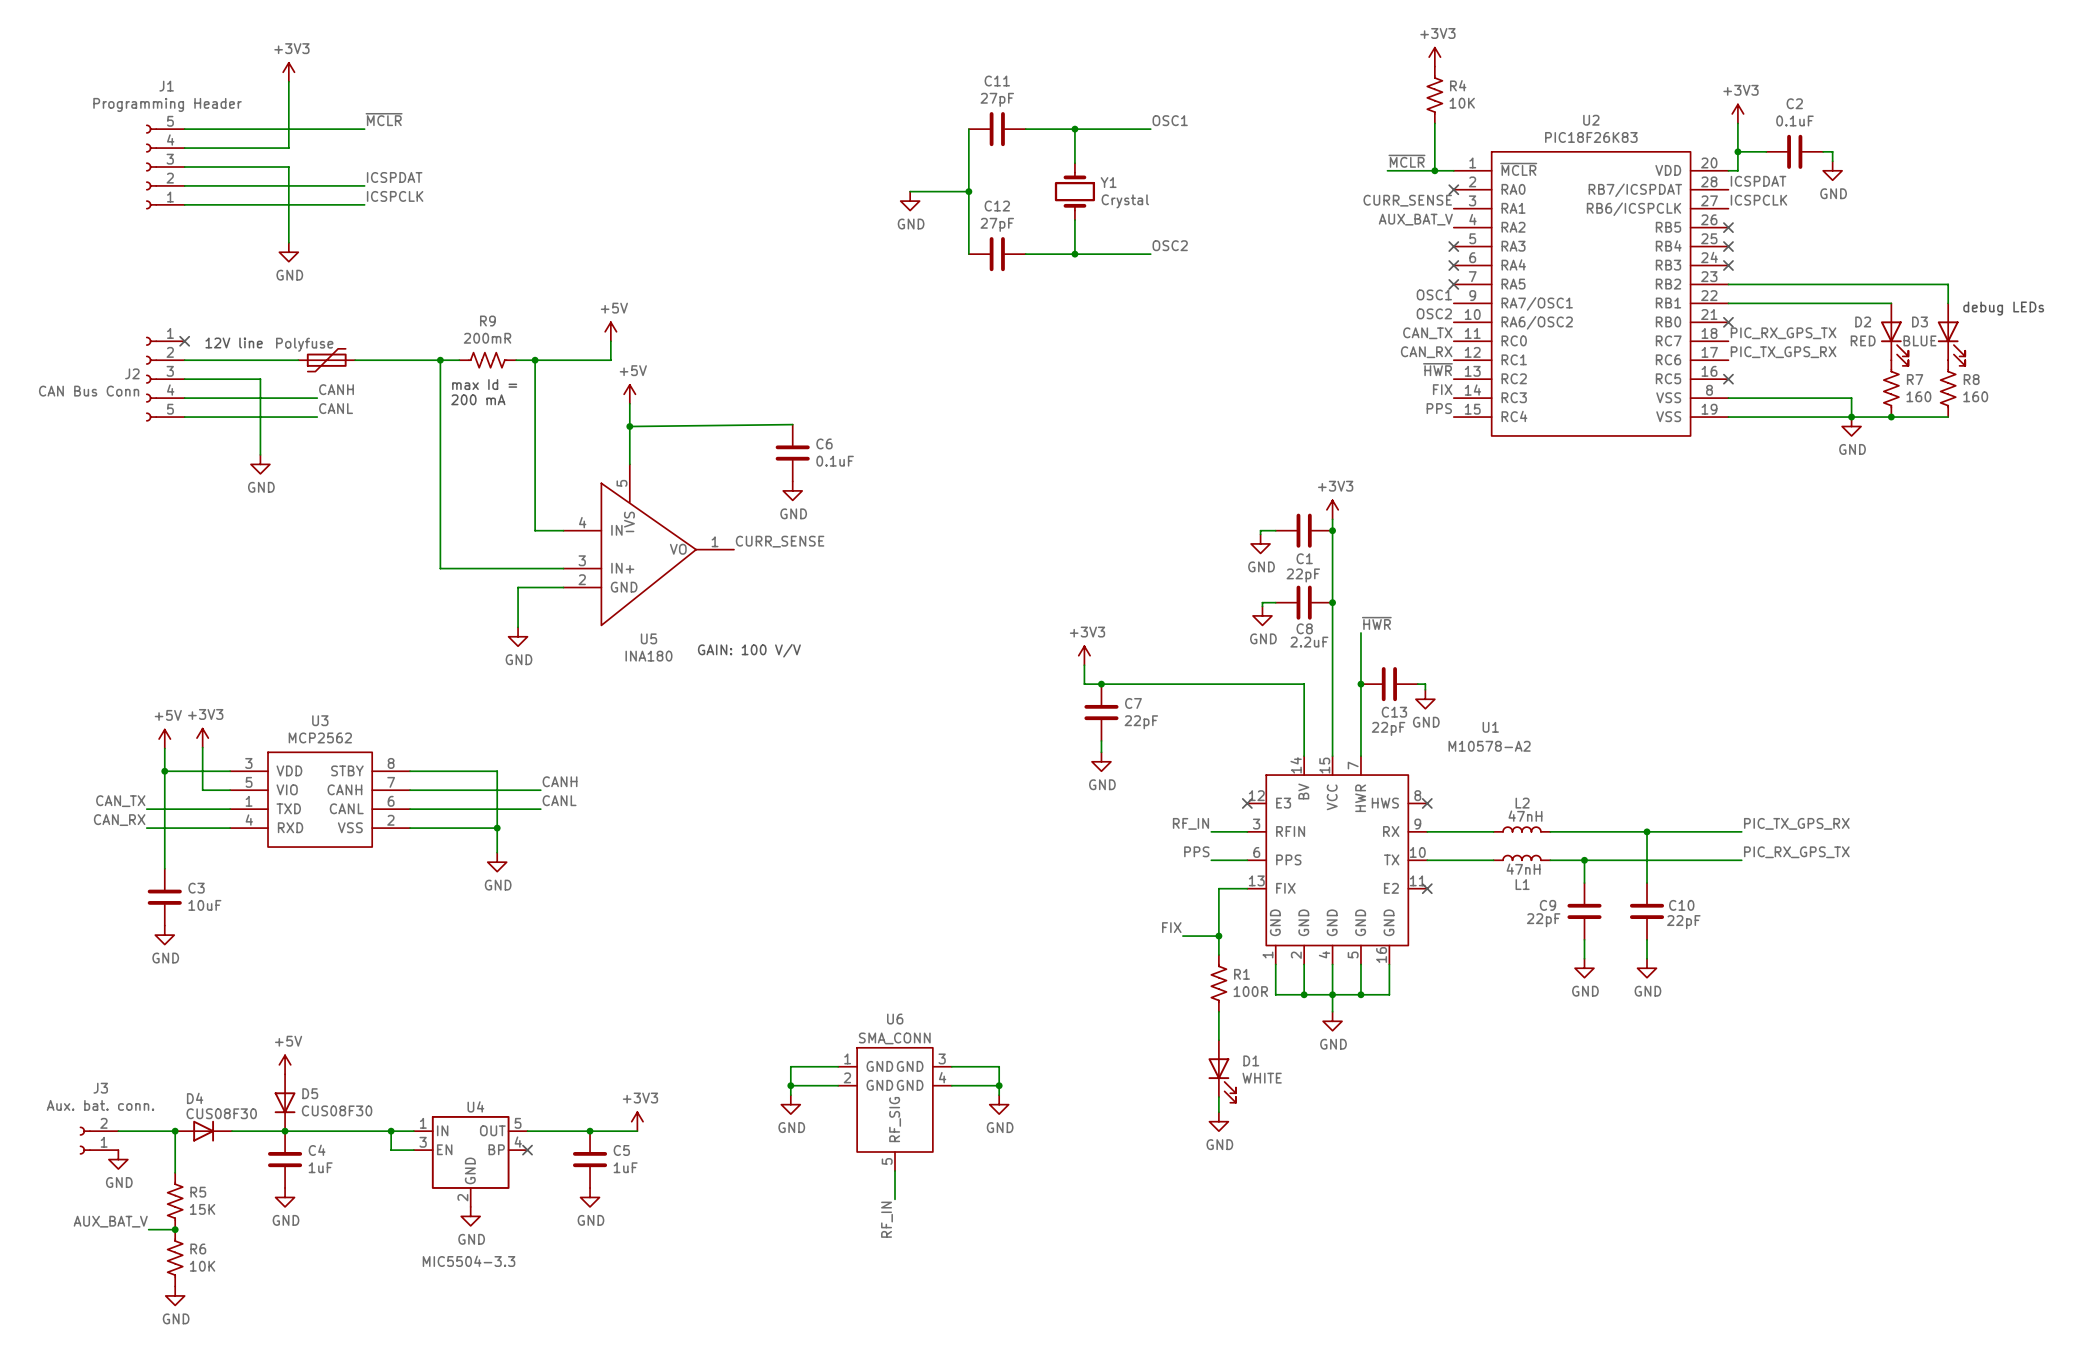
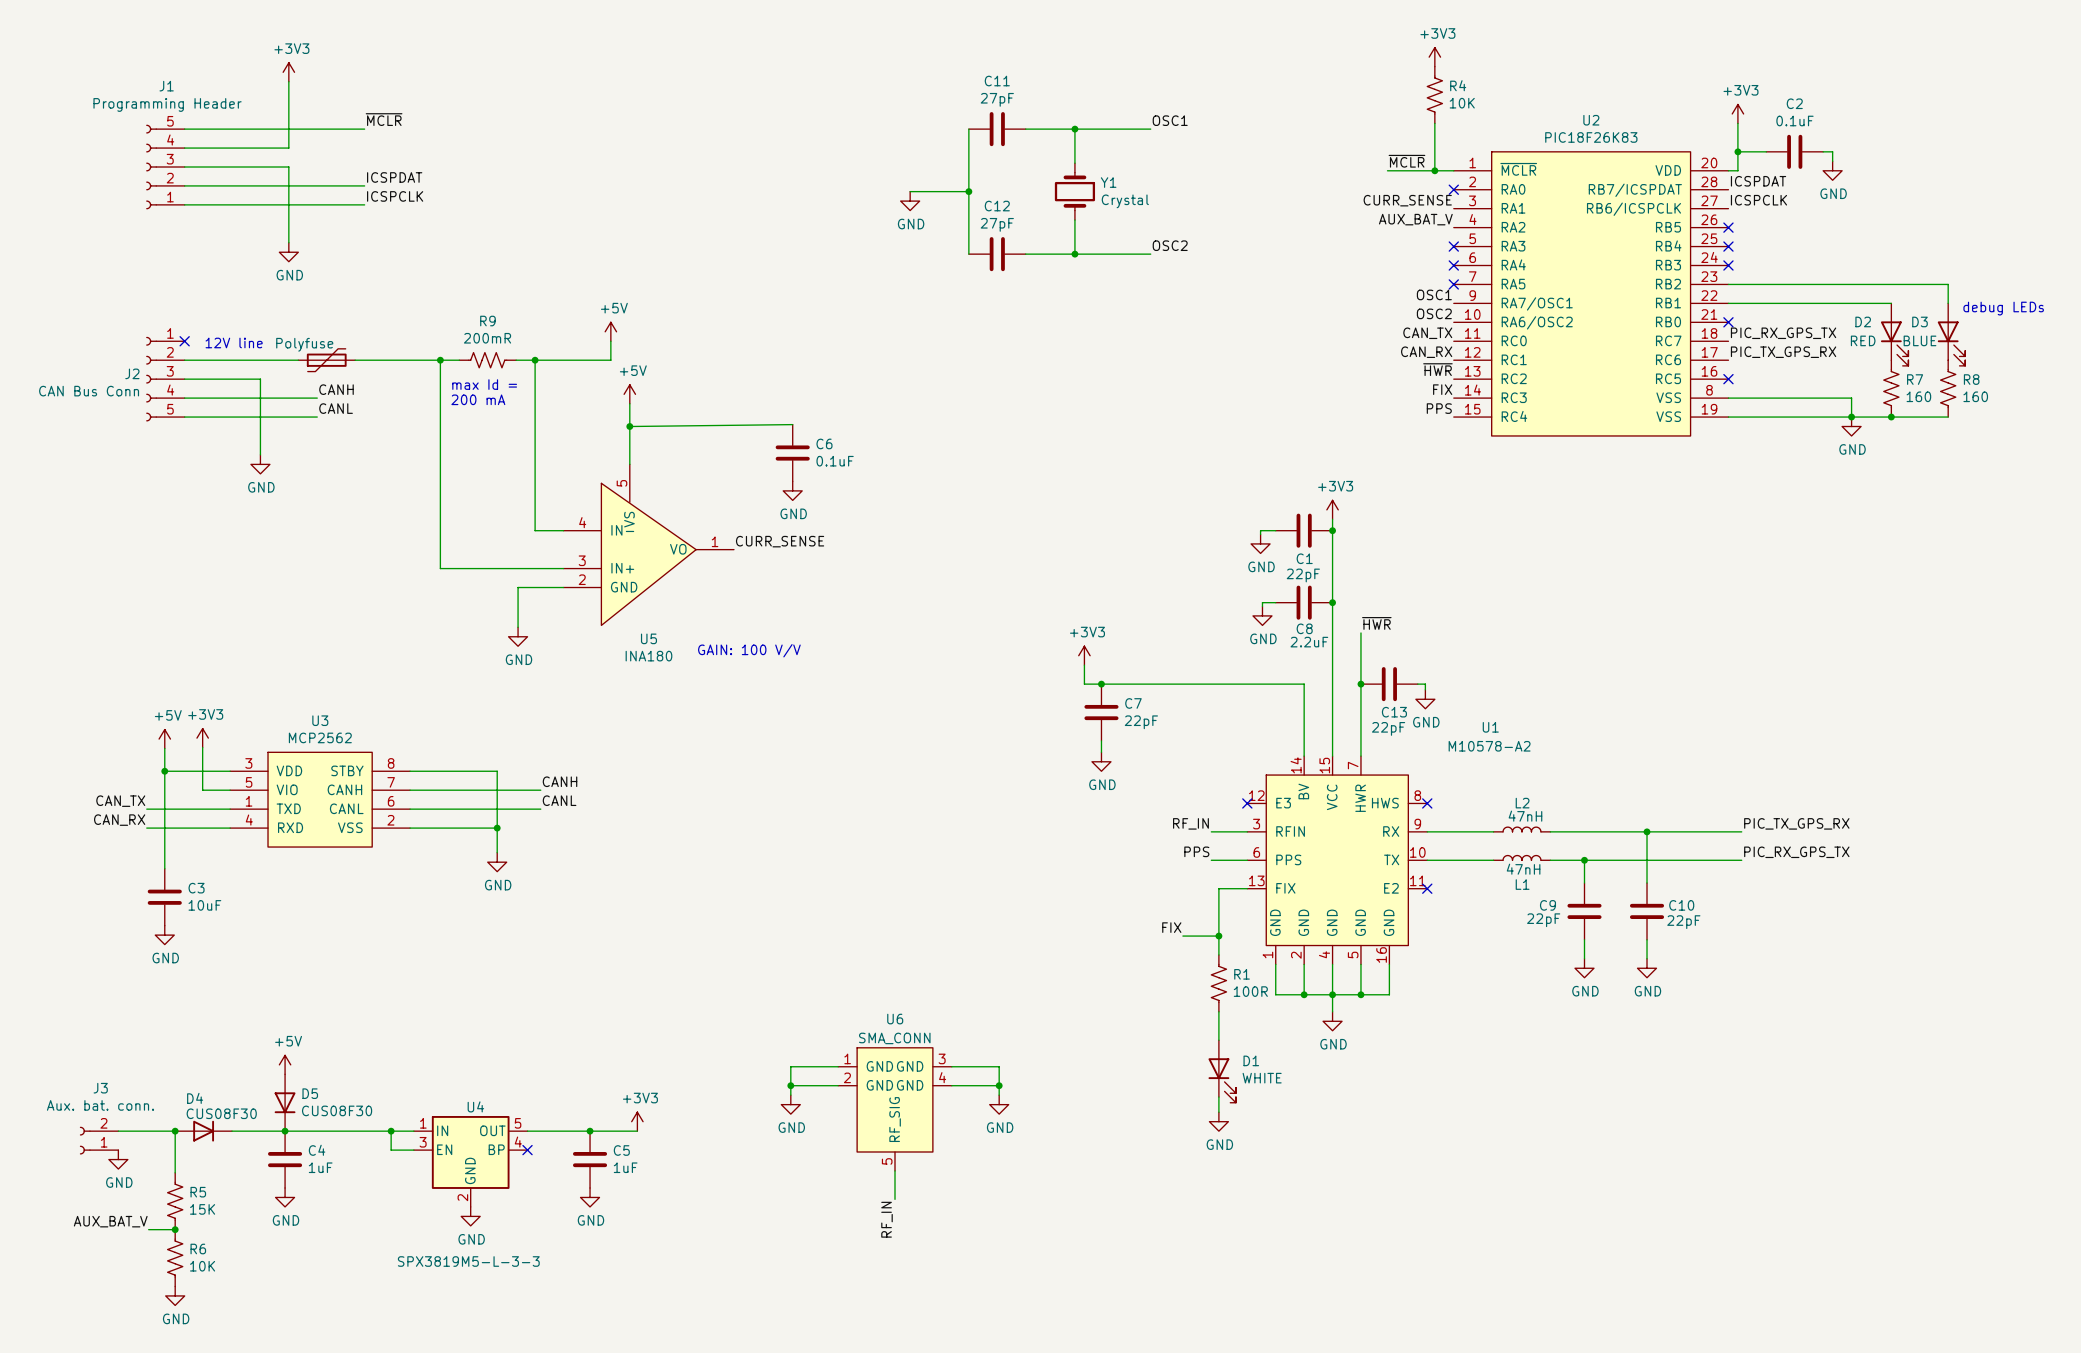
U4 value: MIC5504-3.3 (469, 1261) -> SPX3819M5-L-3-3 (468, 1261)

